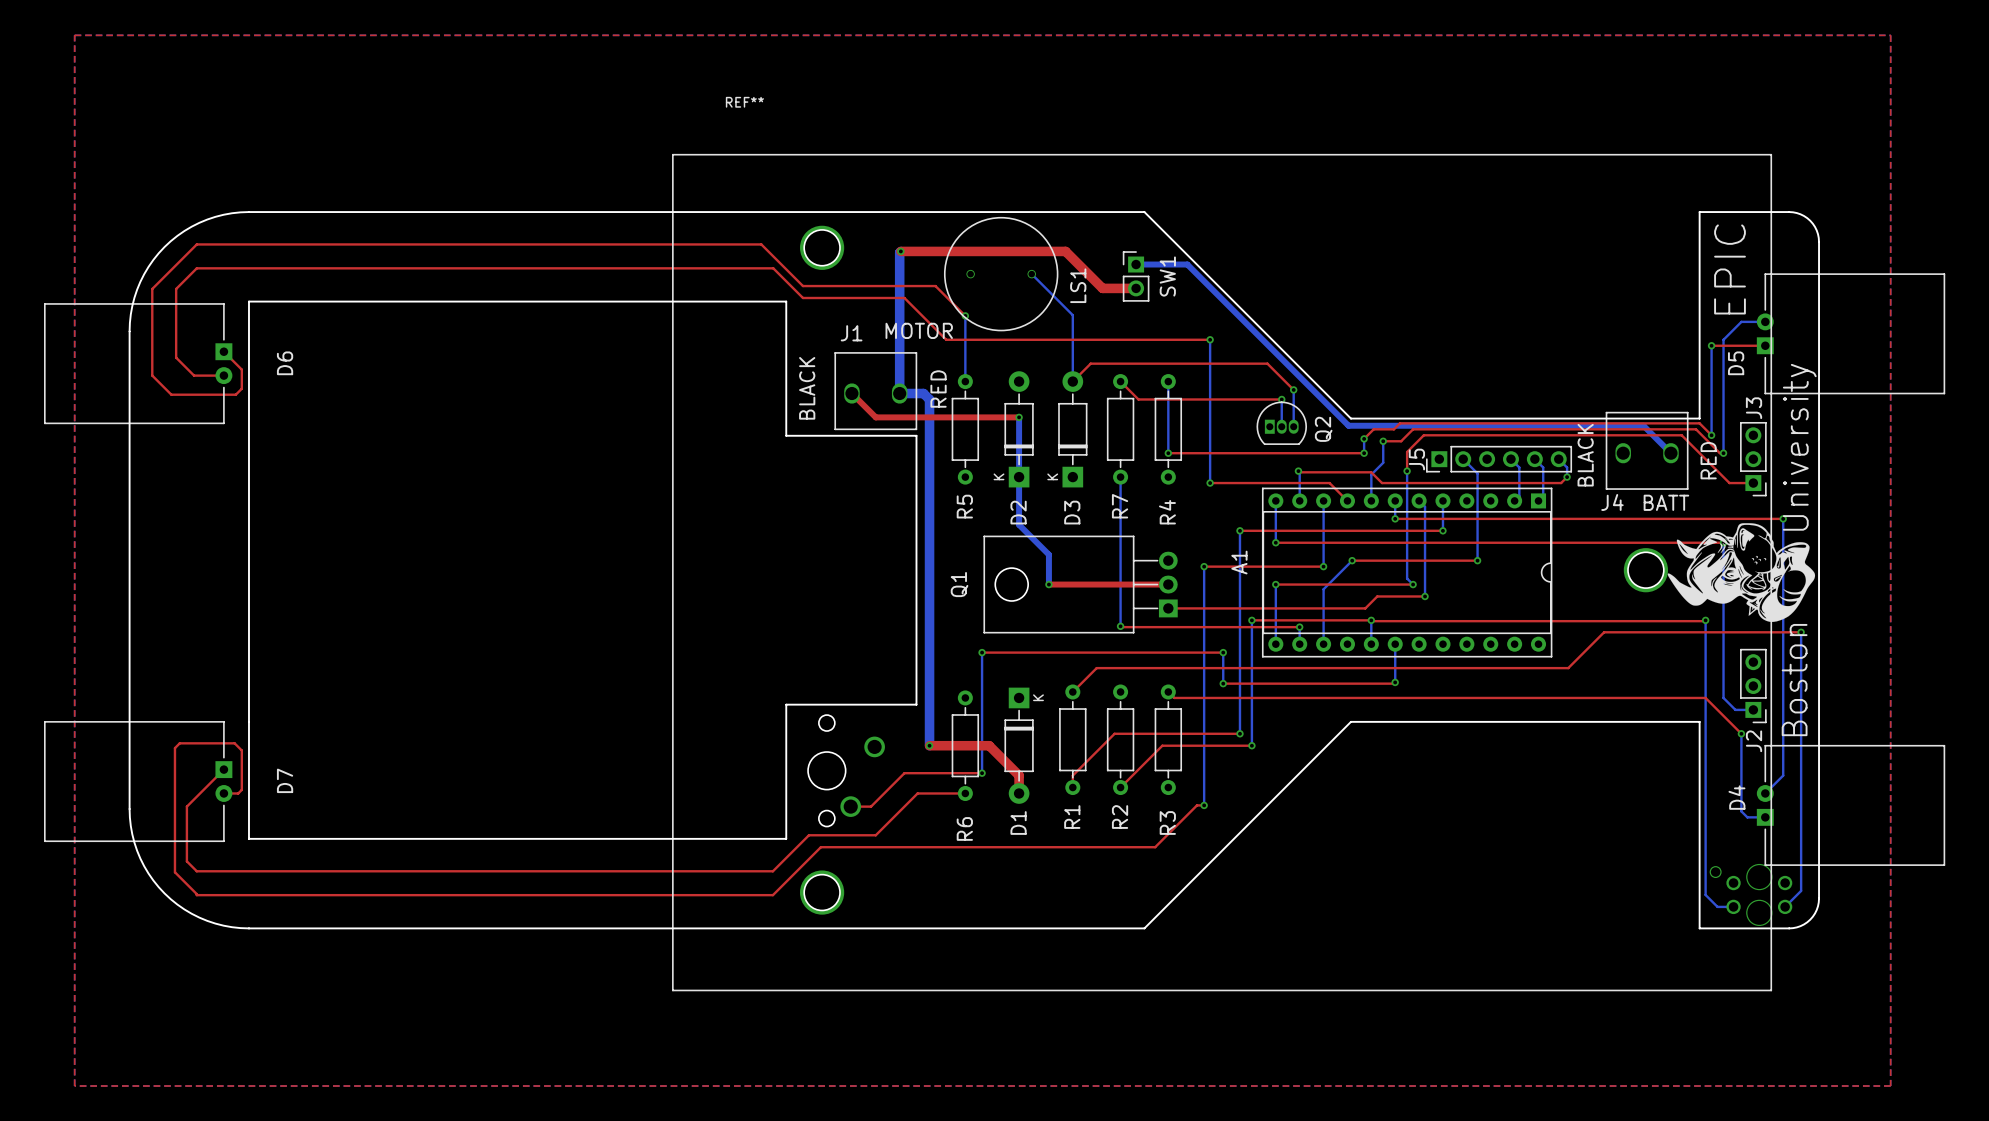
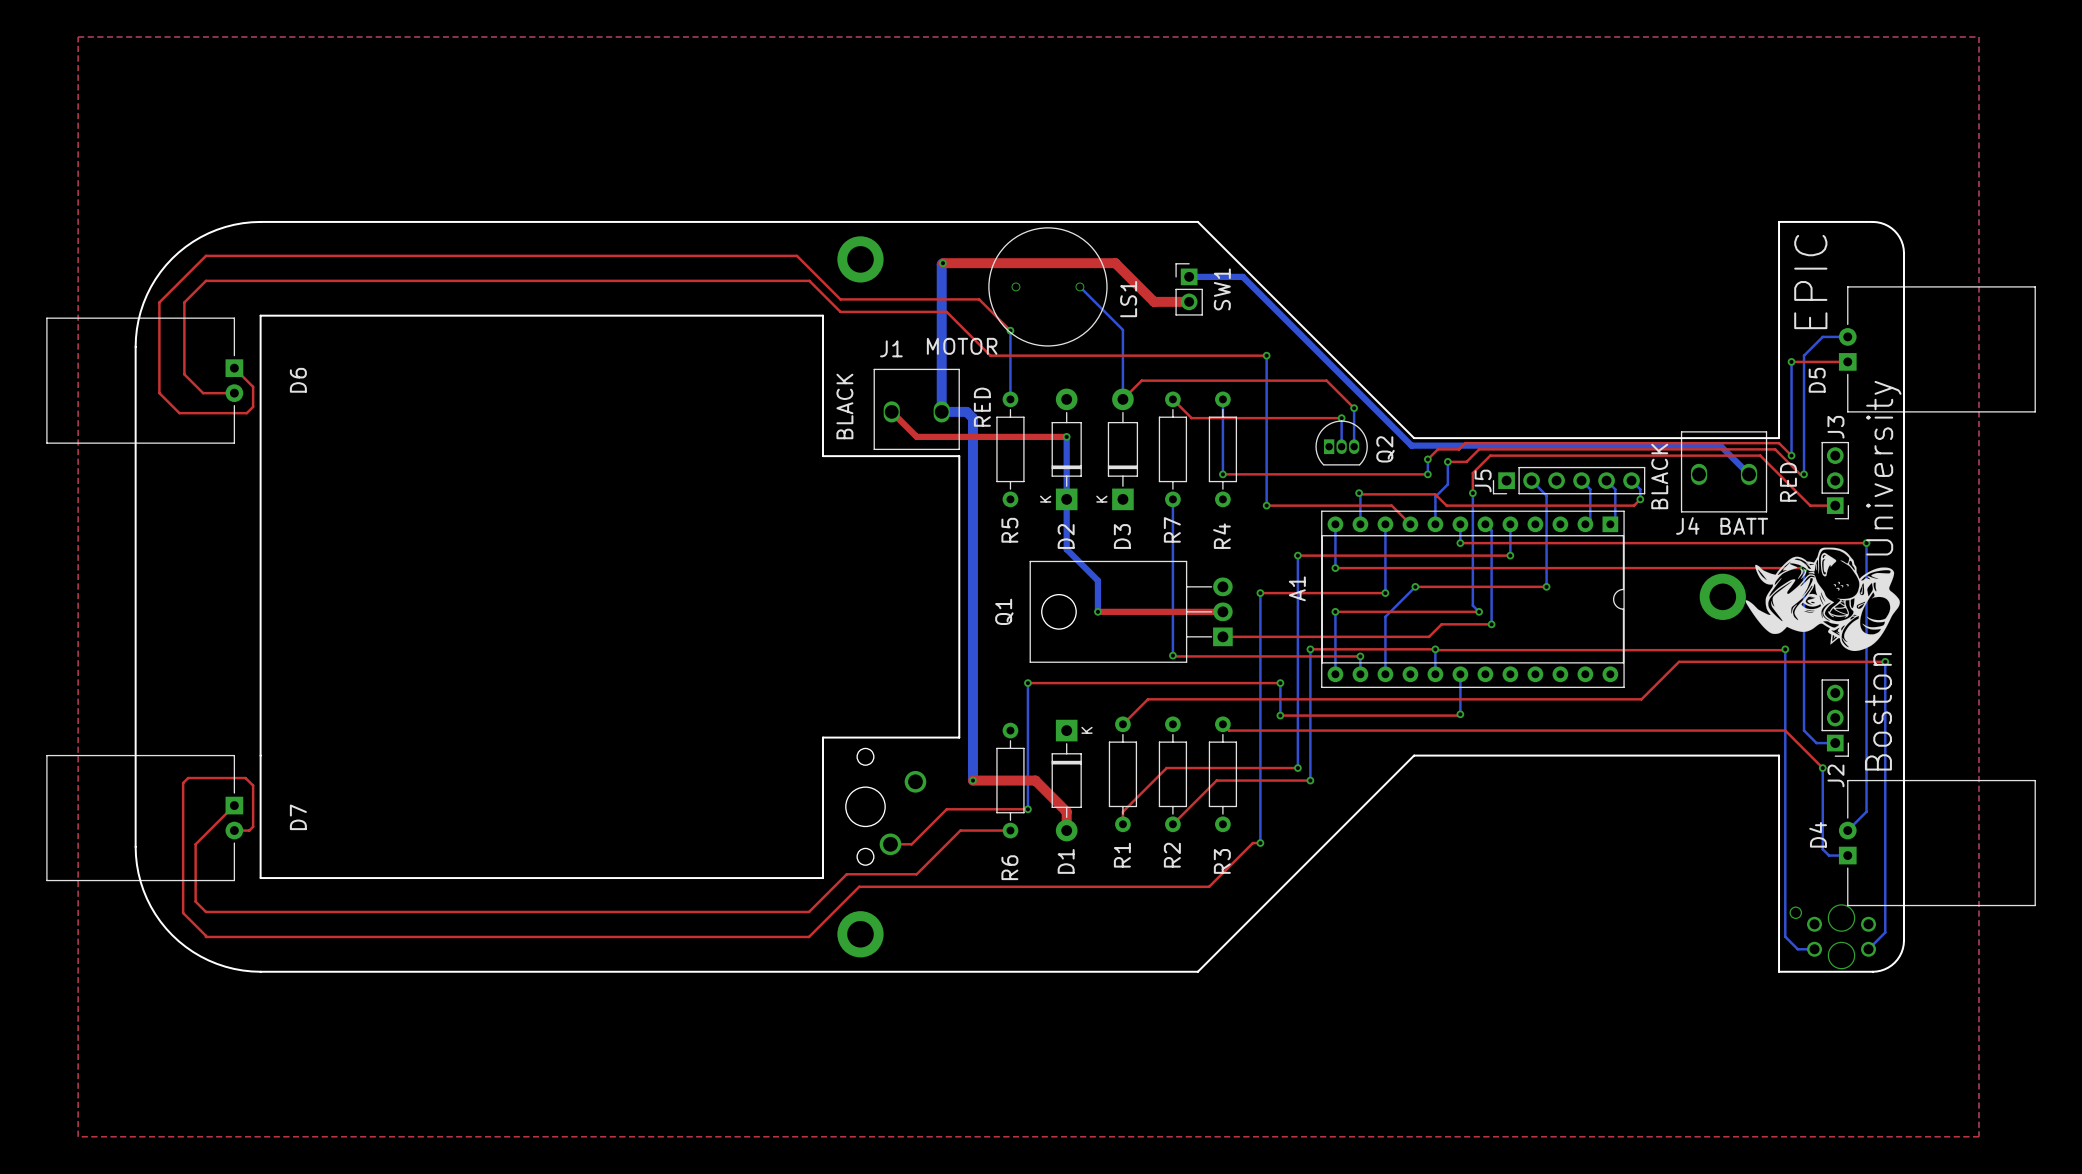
REF**: (1222, 572) -> none

